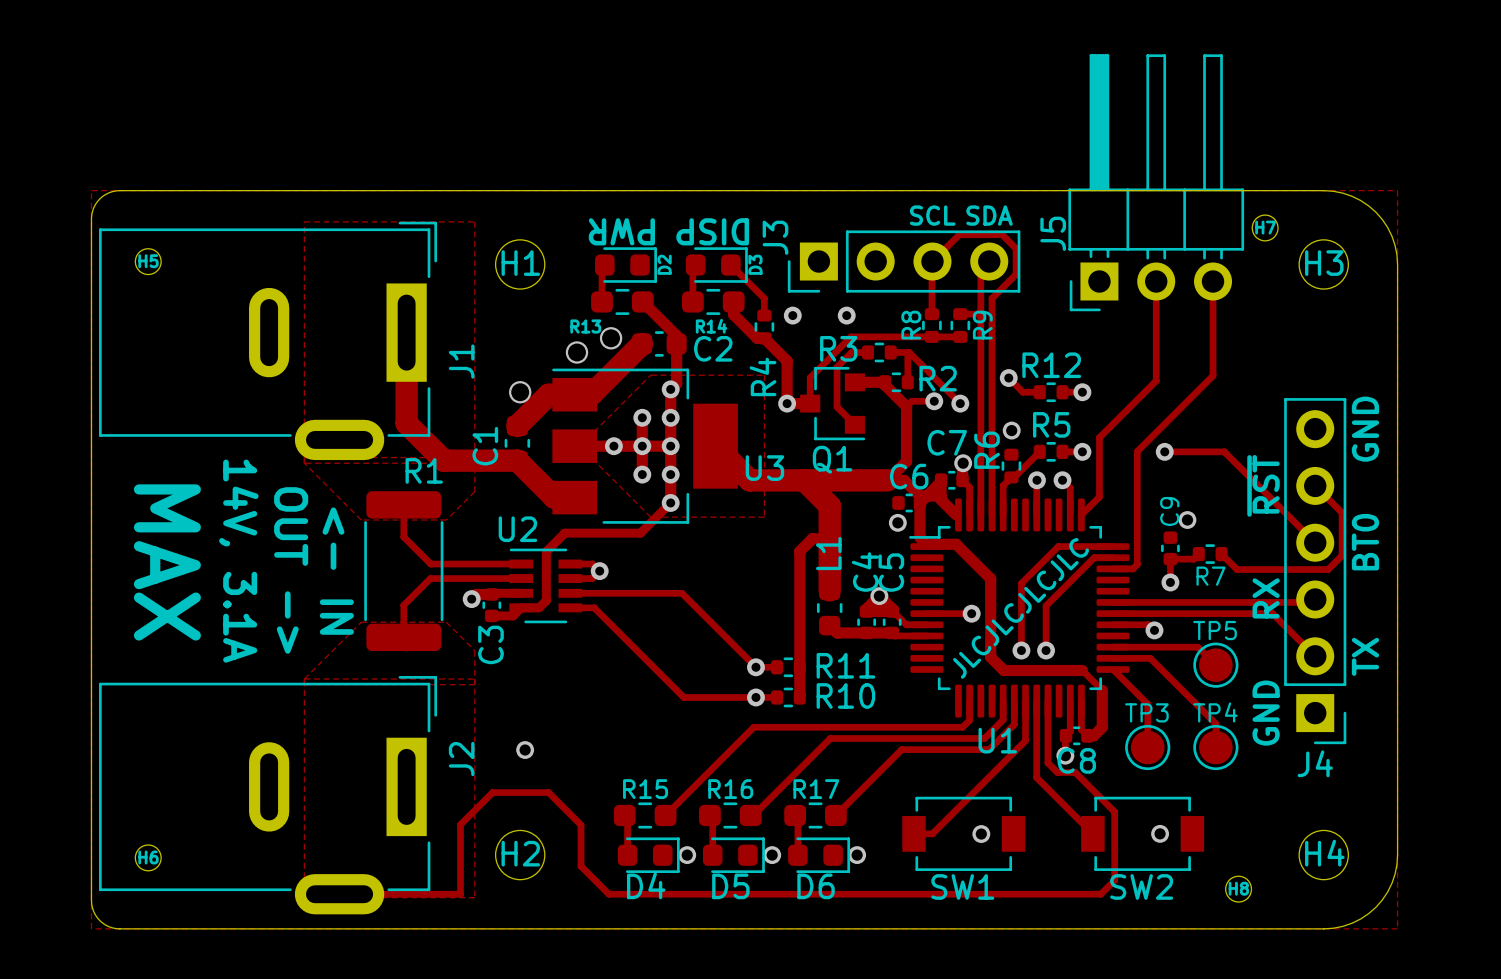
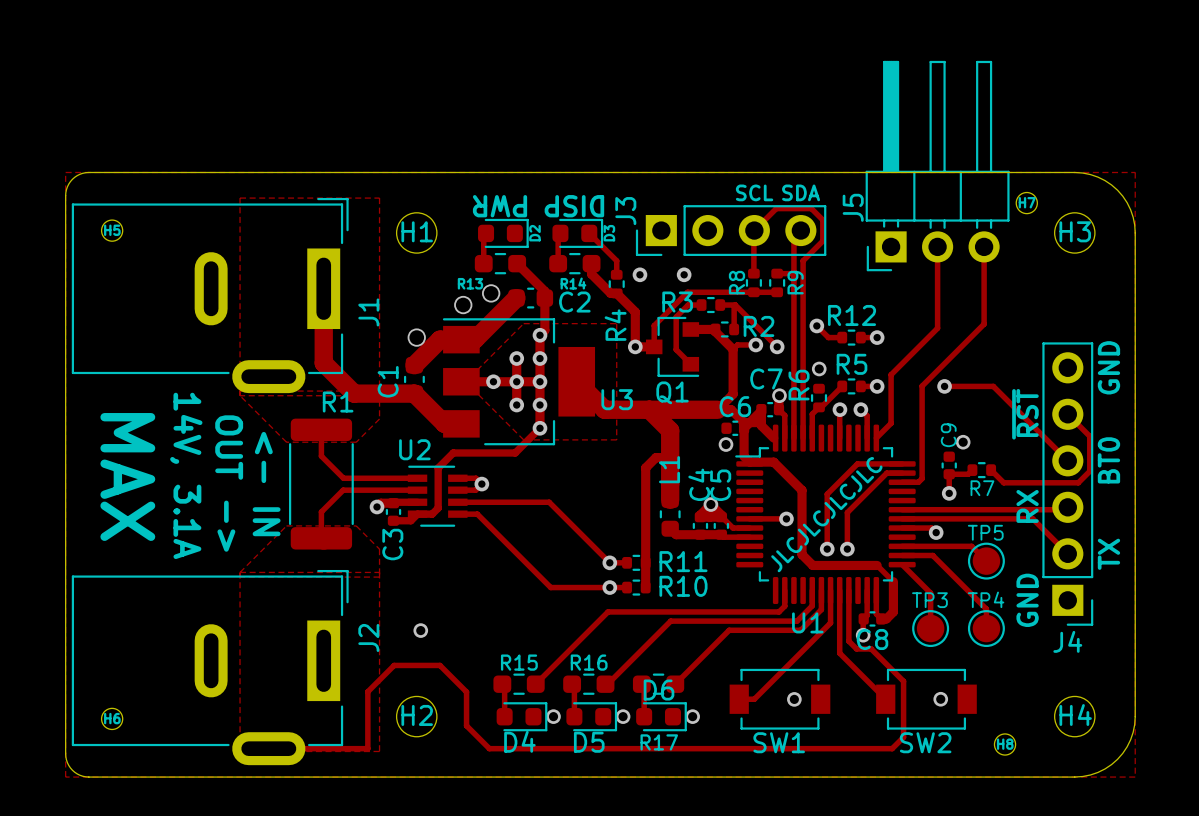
R17 name position: R17 (816, 789) -> R17 (659, 742)
D6 name position: D6 (816, 886) -> D6 (659, 690)

